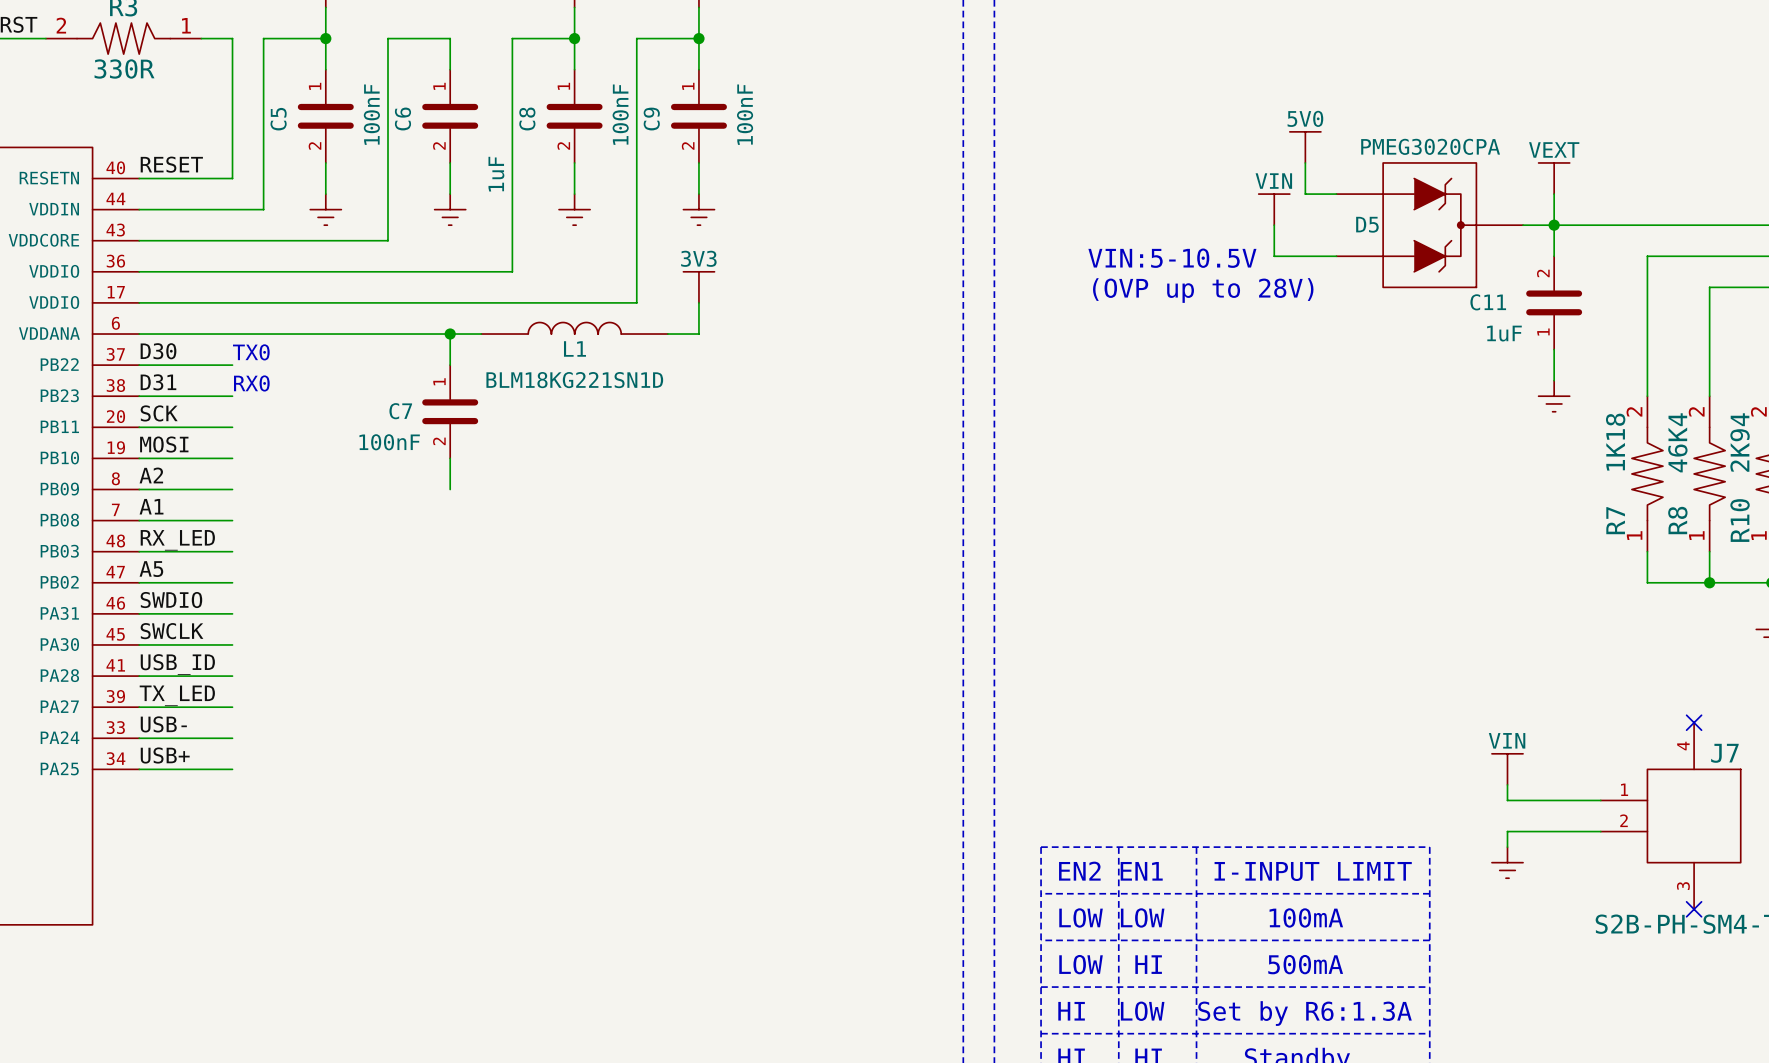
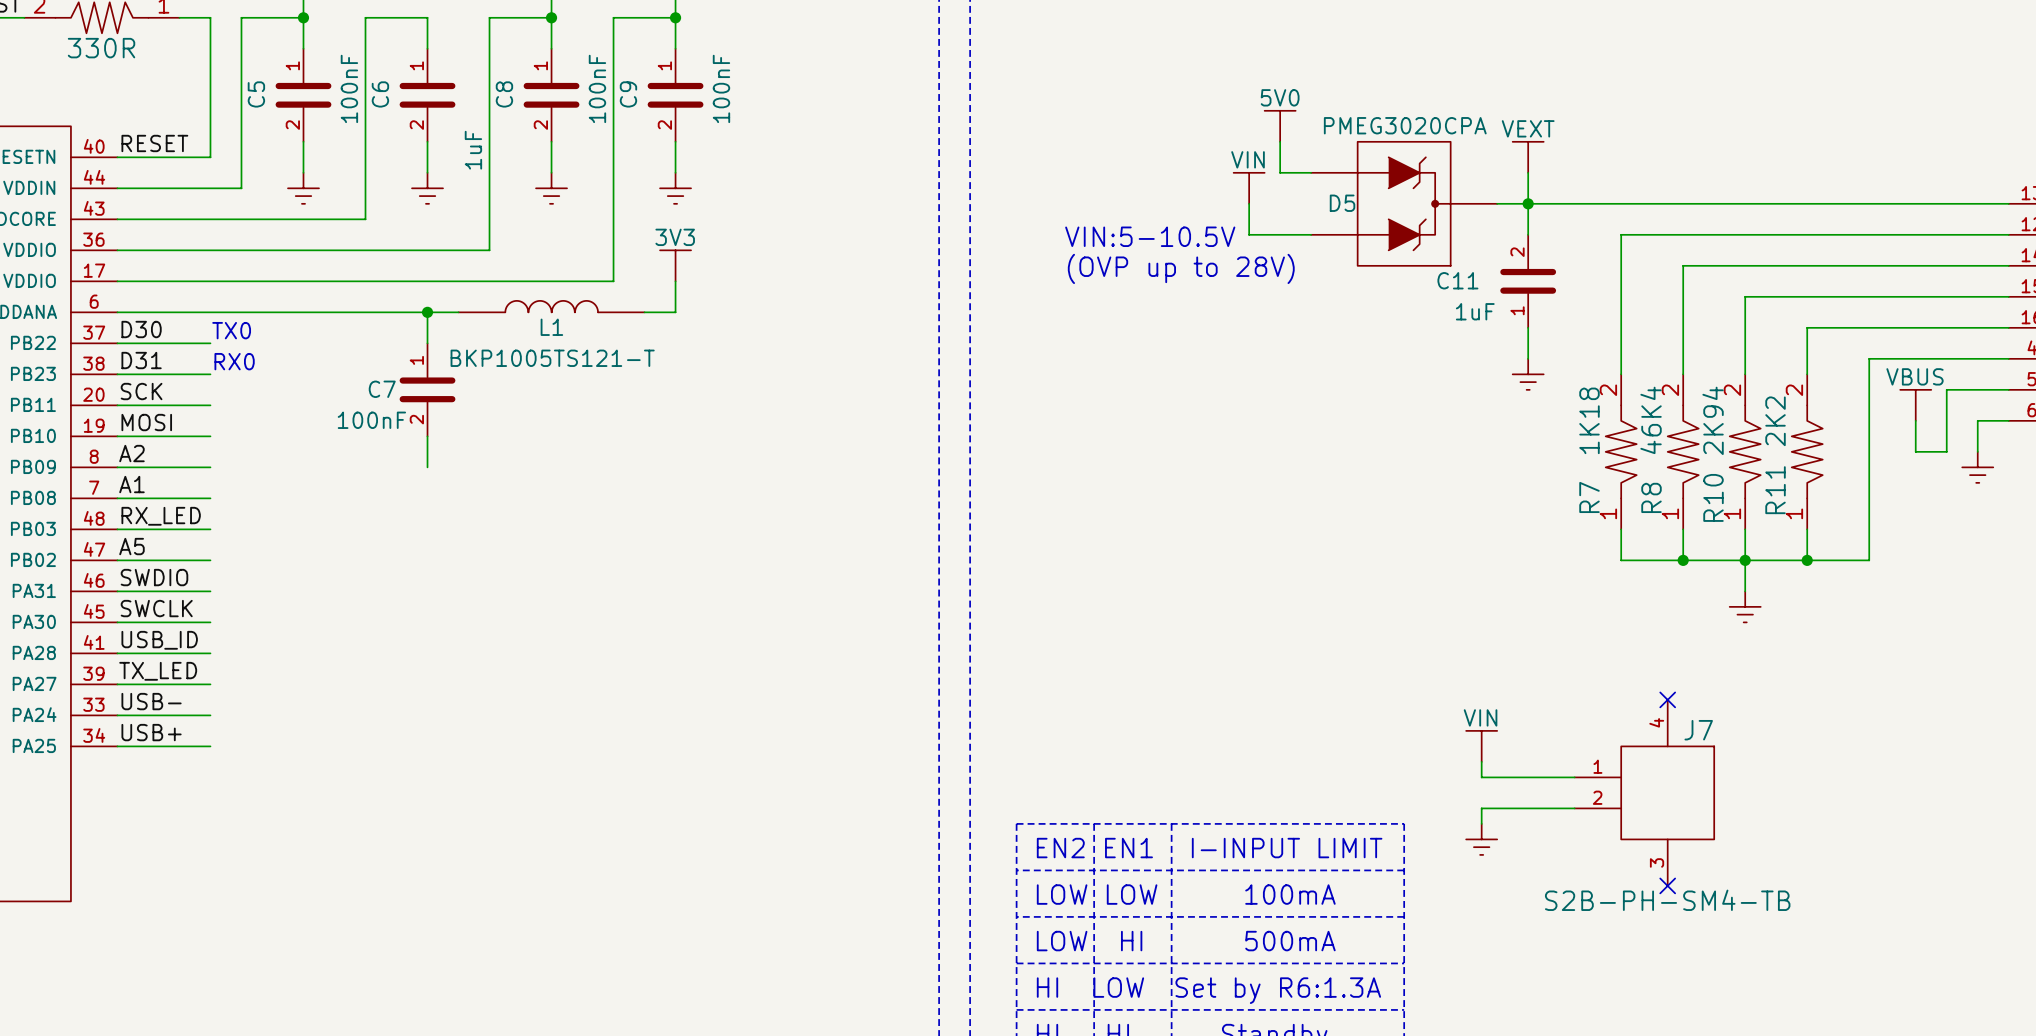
L1 value: BLM18KG221SN1D (574, 380) -> BKP1005TS121-T (552, 358)

